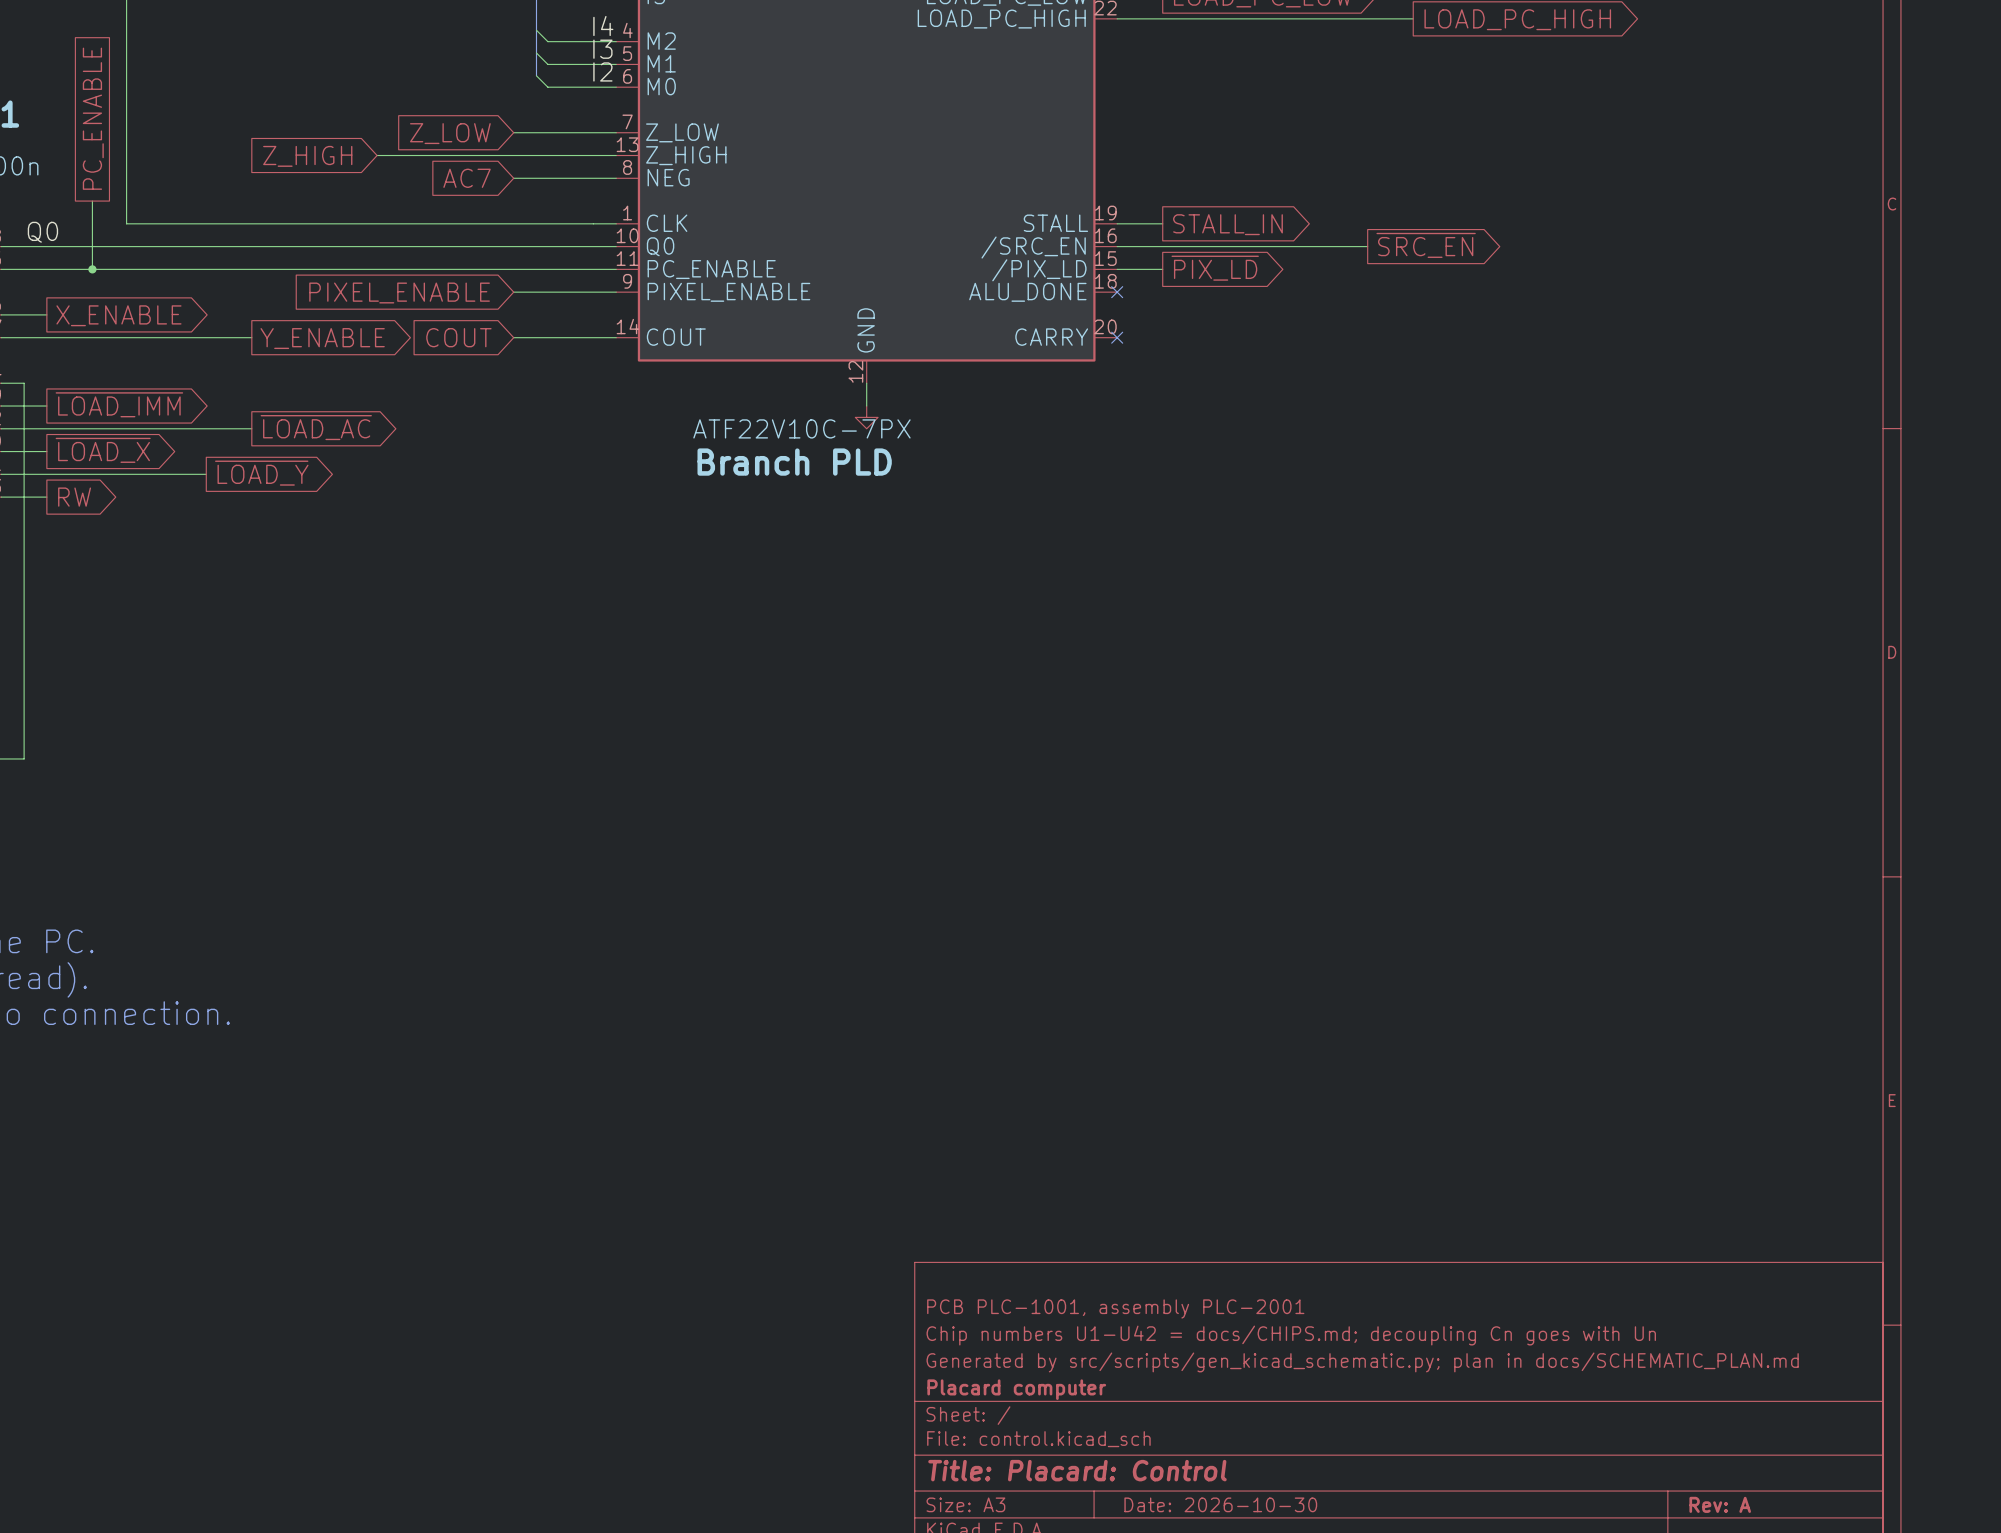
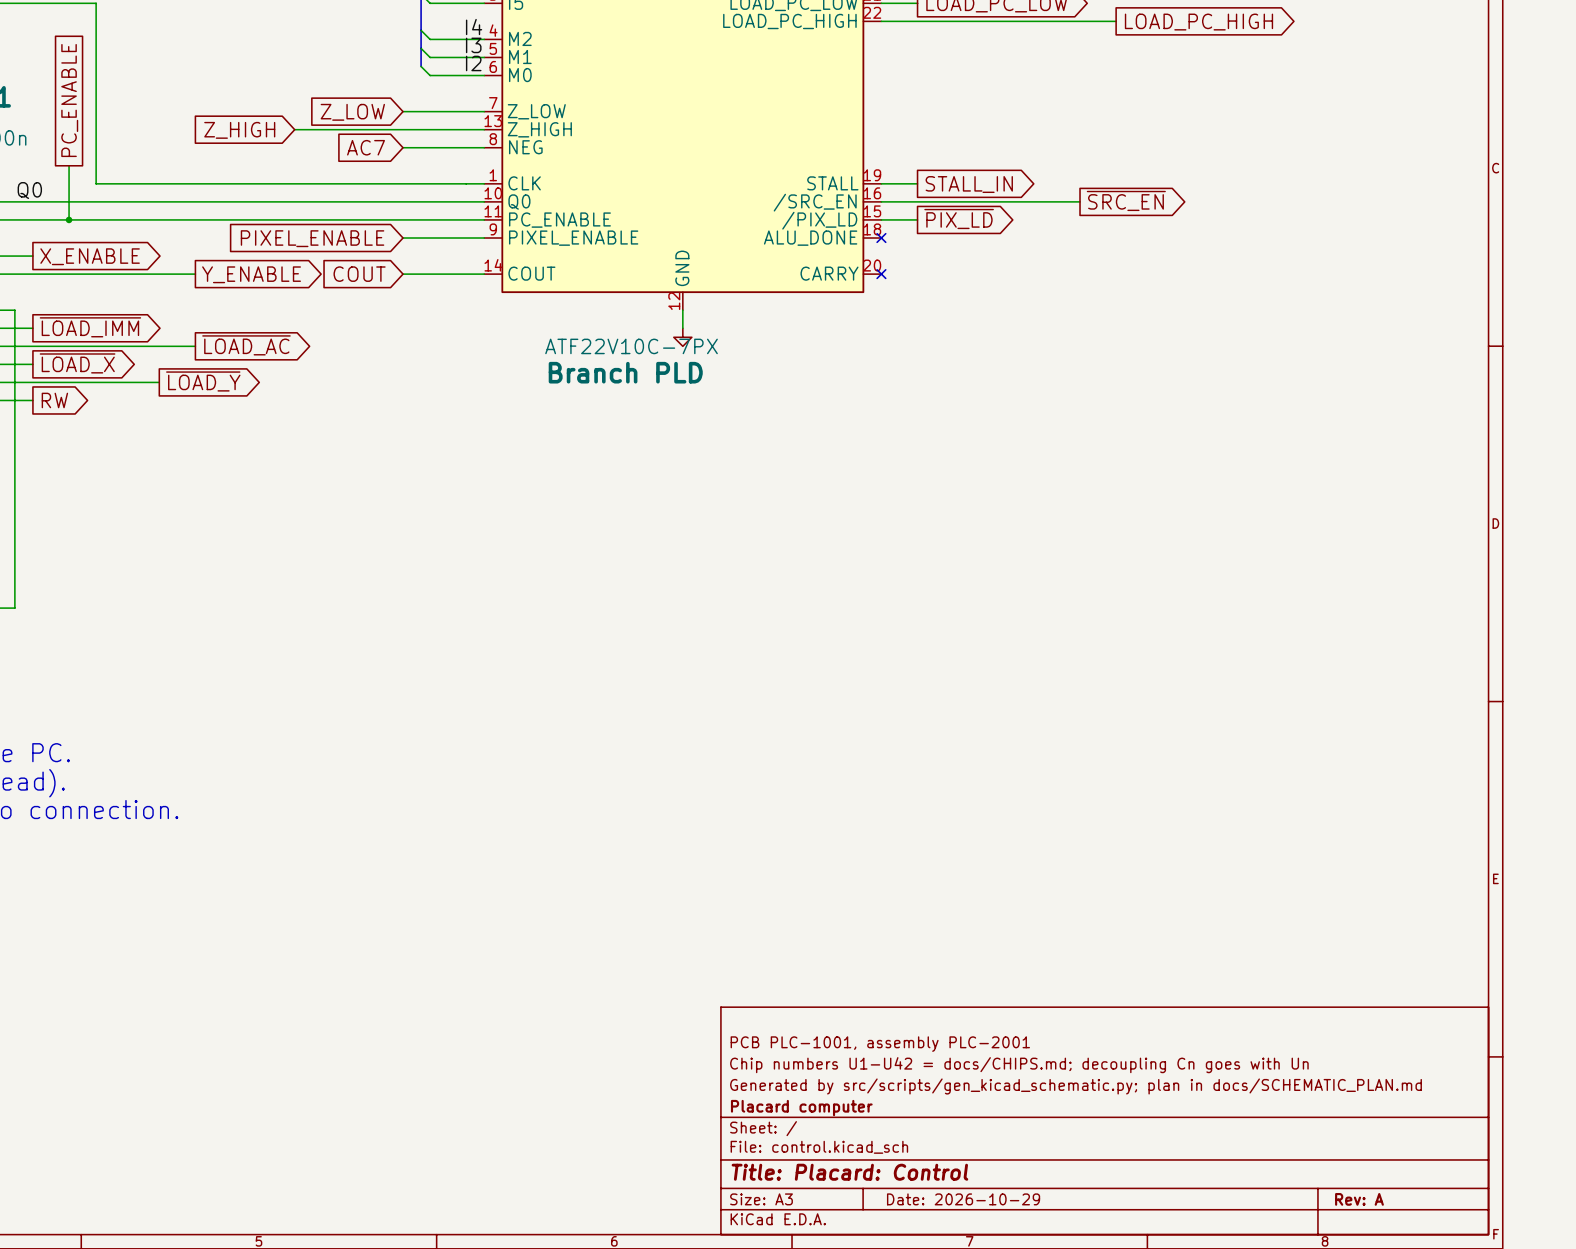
title block: Date: 2026-10-30 (1220, 1504) -> Date: 2026-10-29 (963, 1199)

